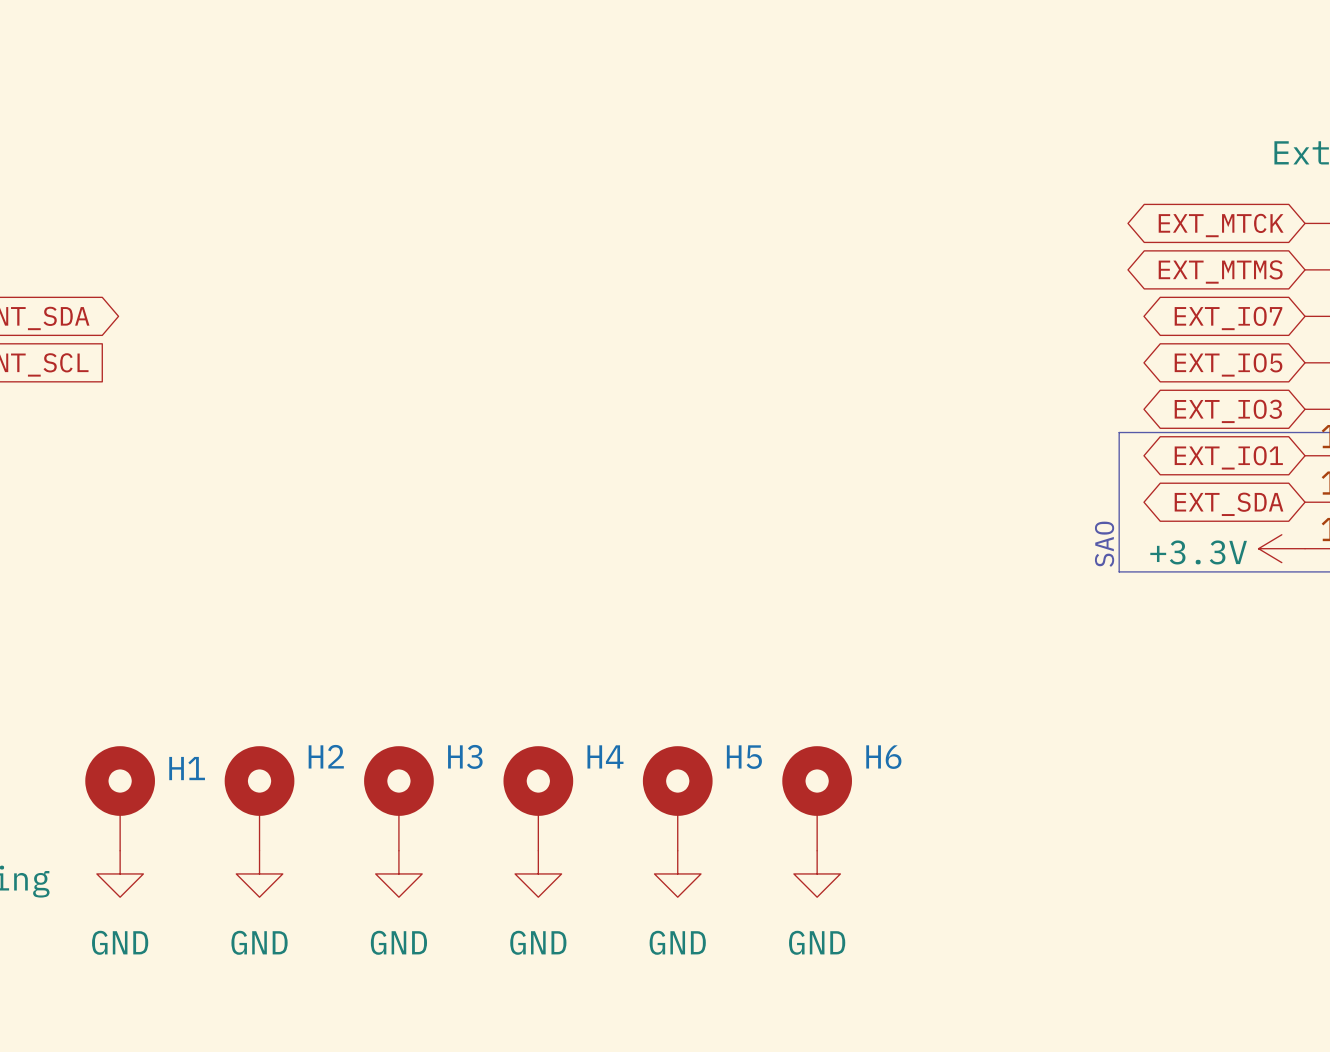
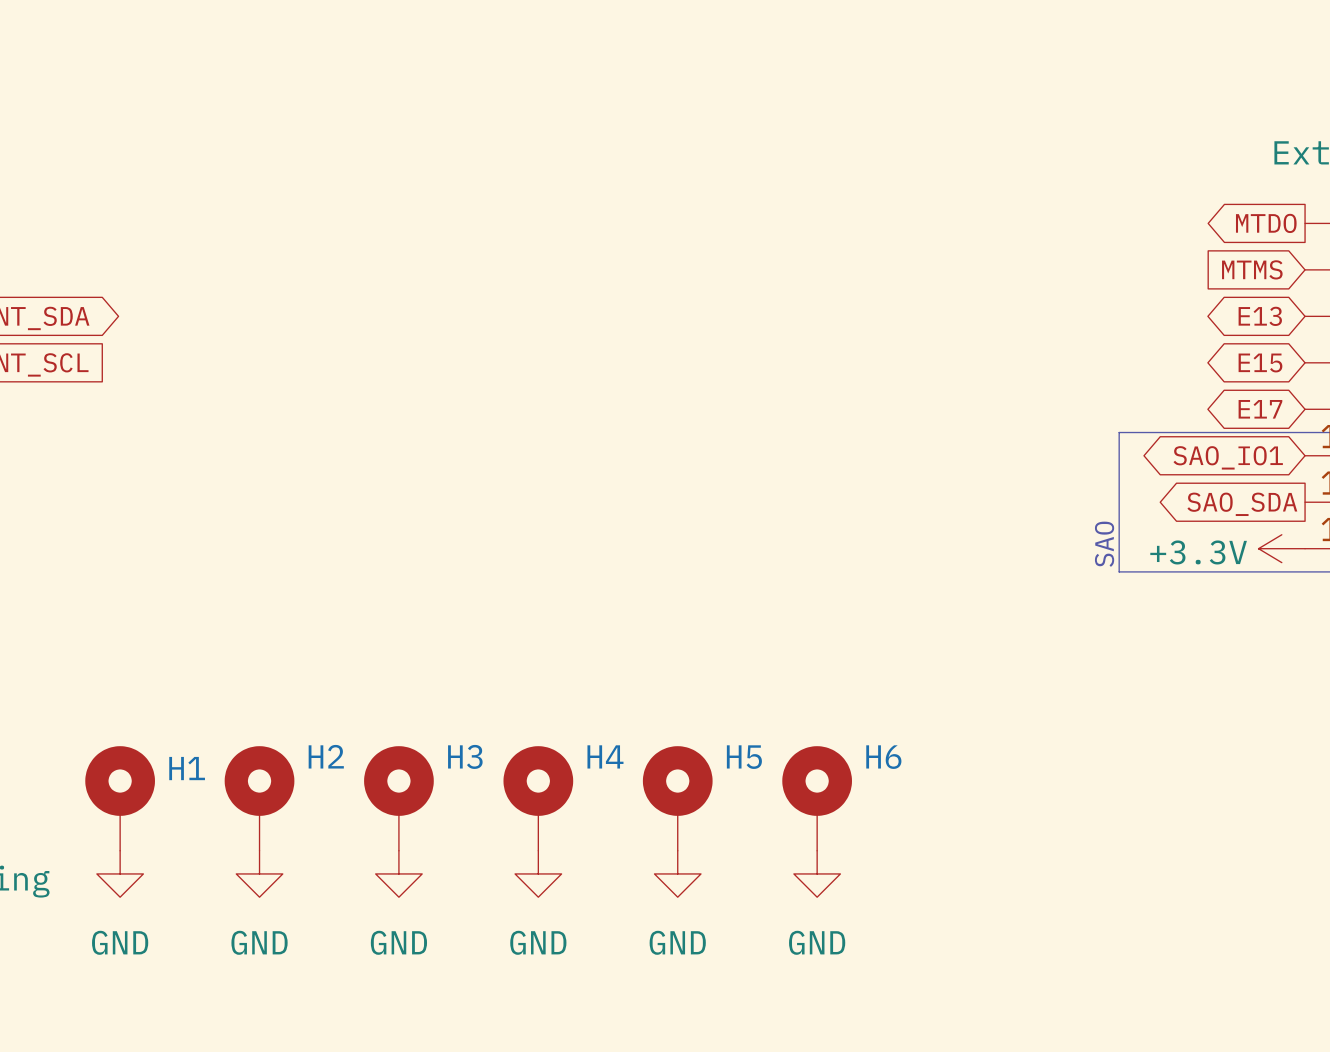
global label shape: bidirectional (1221, 225) -> output (1266, 223)
global label: EXT_MTCK (1221, 225) -> MTDO (1266, 223)
global label shape: bidirectional (1220, 271) -> input (1252, 269)
global label: EXT_MTMS (1220, 271) -> MTMS (1252, 269)
global label: EXT_IO7 (1228, 318) -> E13 (1260, 316)
global label: EXT_IO5 (1228, 364) -> E15 (1260, 362)
global label: EXT_IO3 (1228, 411) -> E17 (1260, 409)
global label: EXT_IO1 (1228, 457) -> SAO_IO1 (1228, 457)
global label shape: bidirectional (1229, 504) -> output (1242, 504)
global label: EXT_SDA (1229, 504) -> SAO_SDA (1242, 504)

